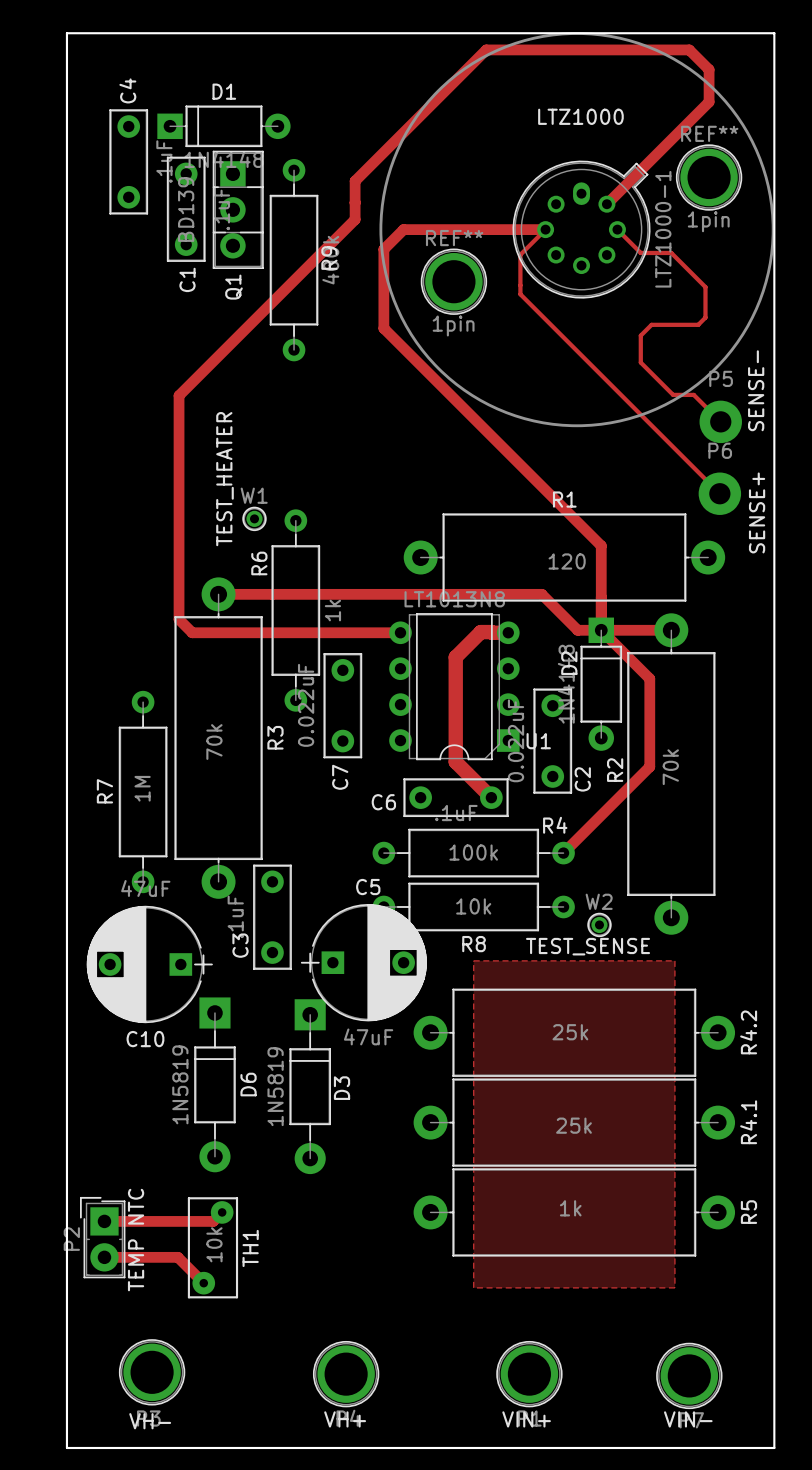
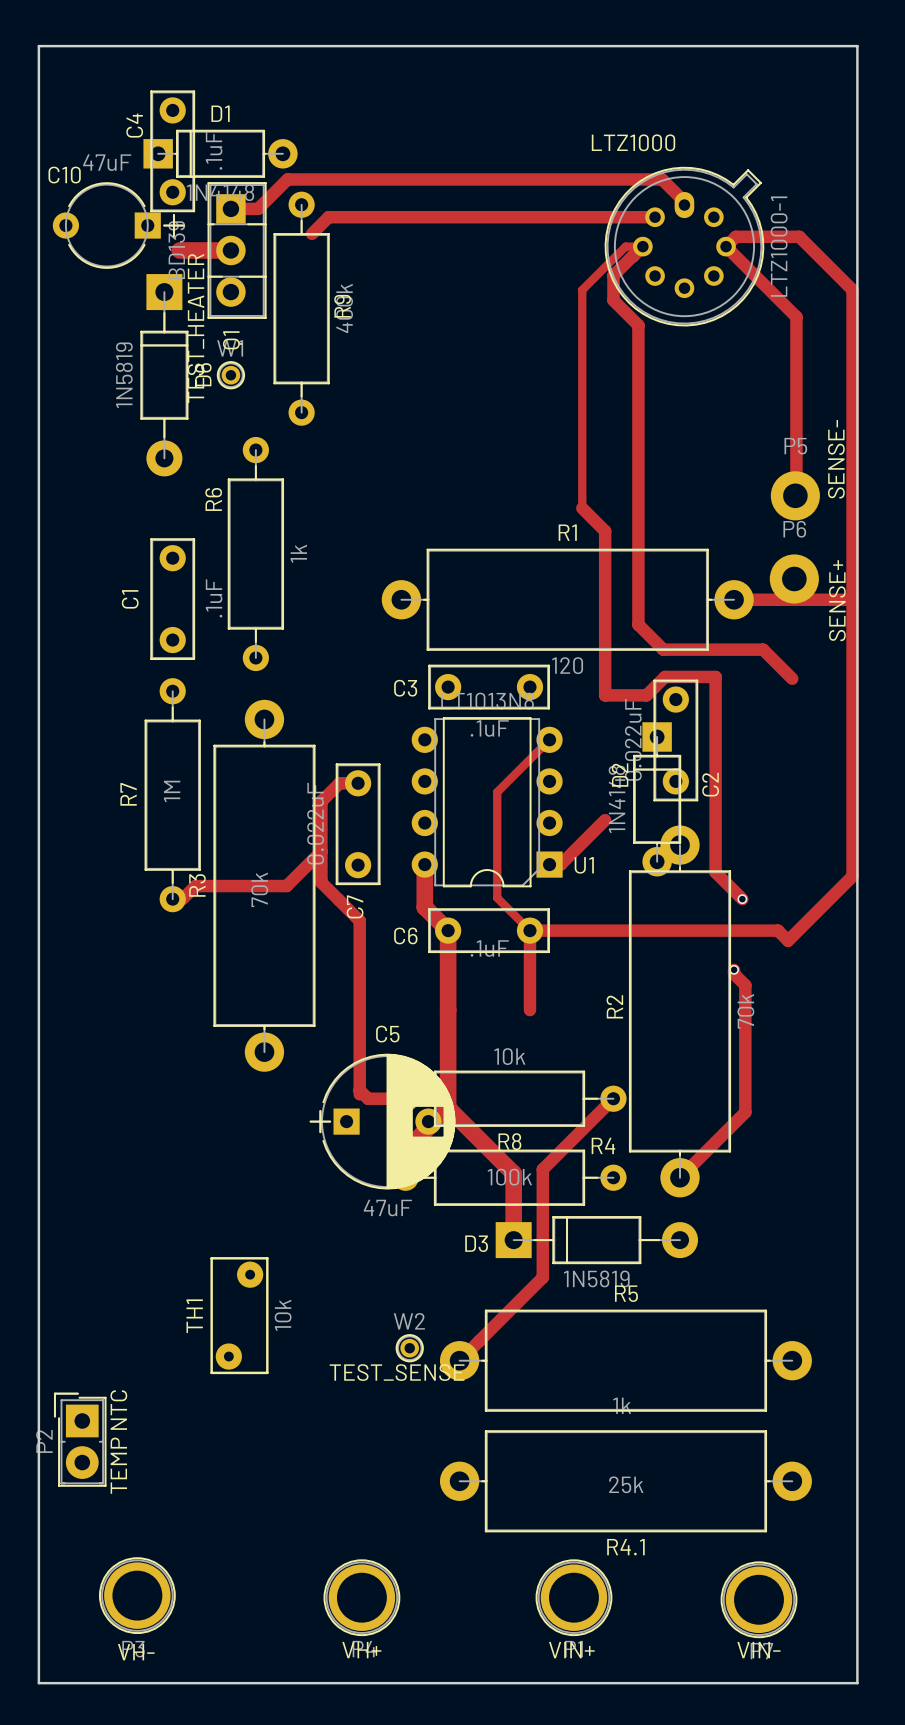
drawing: [379, 32, 775, 428] -> none
C4 name position: C4 (127, 90) -> C4 (134, 125)
C4 position: (128, 161) -> (172, 151)
track: none -> (684, 205) (684, 201) (662, 179) (287, 179) (258, 208) (230, 208)
REF**: 1pin (709, 177) -> none
track: none -> (655, 217) (328, 217) (312, 233)
track: (606, 204) (709, 102) (709, 69) (689, 49) (486, 49) (355, 181) (355, 219) (179, 395) (179, 619) (192, 632) (400, 632) -> none
C1 position: (186, 209) -> (172, 599)
track: none -> (179, 250) (230, 250)
LTZ1000-1 position: (581, 229) -> (684, 246)
track: (617, 229) (640, 252) (671, 252) (705, 287) (705, 317) (698, 324) (651, 324) (640, 335) (640, 362) (673, 394) (693, 394) (720, 421) -> none
C1 name position: C1 (187, 279) -> C1 (130, 599)
REF**: 1pin (453, 281) -> none
track: none -> (796, 499) (796, 317) (726, 246) (735, 236) (799, 236) (852, 289) (852, 876) (788, 940) (778, 930) (529, 930) (529, 1010)
track: (719, 493) (520, 294) (520, 254) (545, 229) (403, 229) (383, 249) (383, 328) (601, 545) (601, 630) (649, 678) (649, 766) (563, 853) -> none
track: none -> (734, 599) (852, 599)
W1 position: (254, 518) -> (230, 375)
R1 position: (564, 557) -> (567, 599)
R1 value position: 120 (567, 561) -> 120 (567, 665)
track: none -> (792, 678) (763, 649) (663, 649) (638, 624) (638, 325) (613, 300) (613, 275) (642, 246) (625, 246) (582, 289) (582, 508) (605, 531) (605, 695) (646, 695) (664, 676) (715, 676) (715, 872) (742, 899)
track: (229, 594) (541, 594) (577, 630) (671, 630) -> none
R6 position: (295, 610) -> (255, 554)
track: (508, 632) (480, 632) (455, 657) (455, 762) (463, 769) -> (549, 739) (497, 792) (497, 897)
track: none -> (358, 783) (339, 783) (321, 801) (321, 882) (359, 920) (359, 1094)
track: none -> (605, 820) (560, 864) (549, 864)
track: none -> (321, 851) (286, 886) (195, 886) (182, 899)
R3 name position: R3 (275, 737) -> R3 (197, 885)
R3 position: (218, 738) -> (264, 885)
track: none -> (424, 864) (424, 907) (448, 930) (448, 1108) (405, 1150) (405, 1177)
C2 position: (552, 741) -> (675, 740)
R2 value position: 70k (670, 767) -> 70k (745, 1011)
track width: thick (463, 769) (491, 797) -> thin (497, 897) (529, 930)
via: none -> (742, 899)
R2 position: (671, 774) -> (680, 1011)
R7 position: (143, 791) -> (172, 795)
track: none -> (734, 969) (734, 973) (745, 985) (745, 1112) (680, 1177)
via: none -> (734, 969)
R4 position: (473, 853) -> (509, 1177)
C10 footprint: [86, 905, 213, 1024] -> [52, 182, 185, 269]
R8 position: (473, 906) -> (509, 1098)
C3 value position: .1uF (235, 916) -> .1uF (489, 728)
C3 rotation: 0° (272, 917) -> 90° clockwise (489, 687)
C3 position: (272, 917) -> (489, 687)
W2 position: (599, 924) -> (409, 1348)
track: none -> (359, 1090) (368, 1098) (405, 1098)
track: none -> (613, 1098) (542, 1169) (542, 1277) (459, 1360)
C3 name position: C3 (240, 945) -> C3 (405, 688)
track: none -> (442, 1102) (513, 1173) (513, 1240)
zone outline: (473, 960) (674, 960) (674, 1287) (473, 1287) (473, 960) -> none
R4.2: 25k (574, 1032) -> none
C10 name position: C10 (145, 1039) -> C10 (64, 175)
D6 position: (214, 1084) -> (164, 375)
D3 rotation: 0° (310, 1086) -> 90° counterclockwise (596, 1240)
D3 position: (310, 1086) -> (596, 1240)
D3 name position: D3 (342, 1088) -> D3 (476, 1243)
R4.1 position: (574, 1122) -> (625, 1481)
R4.1 name rotation: 0° (748, 1122) -> 90° clockwise (625, 1547)
R4.1 name position: R4.1 (748, 1122) -> R4.1 (625, 1547)
track: (222, 1212) (213, 1221) (104, 1221) -> none
R5 position: (574, 1212) -> (625, 1360)
R5 name rotation: 0° (748, 1212) -> 90° clockwise (626, 1293)
R5 name position: R5 (748, 1212) -> R5 (626, 1293)
TH1 value position: 10k (214, 1244) -> 10k (283, 1315)
TH1 position: (212, 1247) -> (239, 1315)
TH1 name position: TH1 (250, 1248) -> TH1 (194, 1316)
track: (104, 1257) (177, 1257) (203, 1283) -> none

